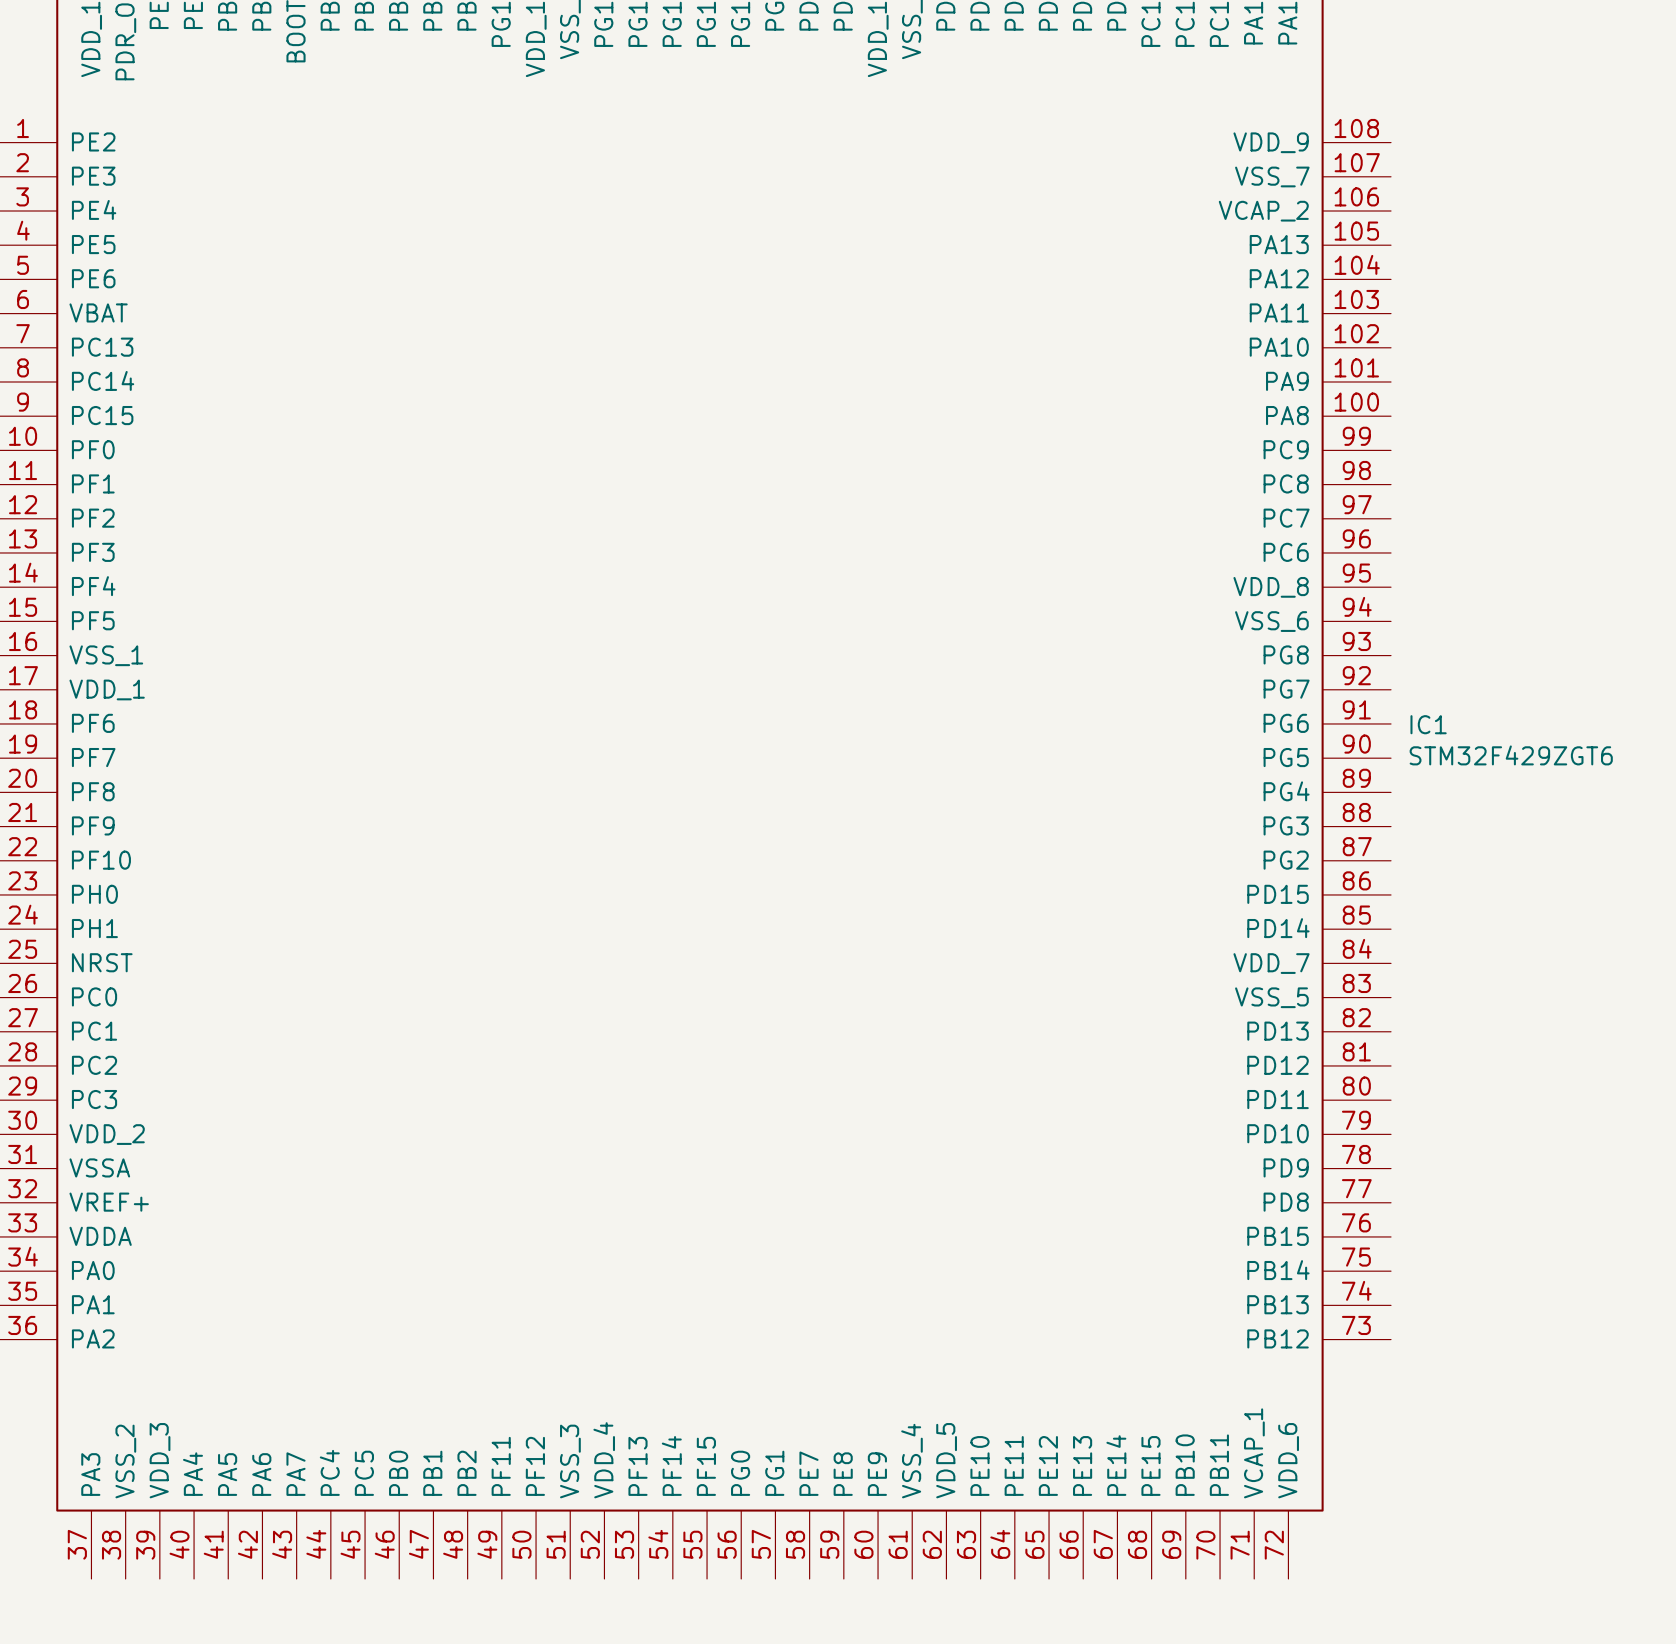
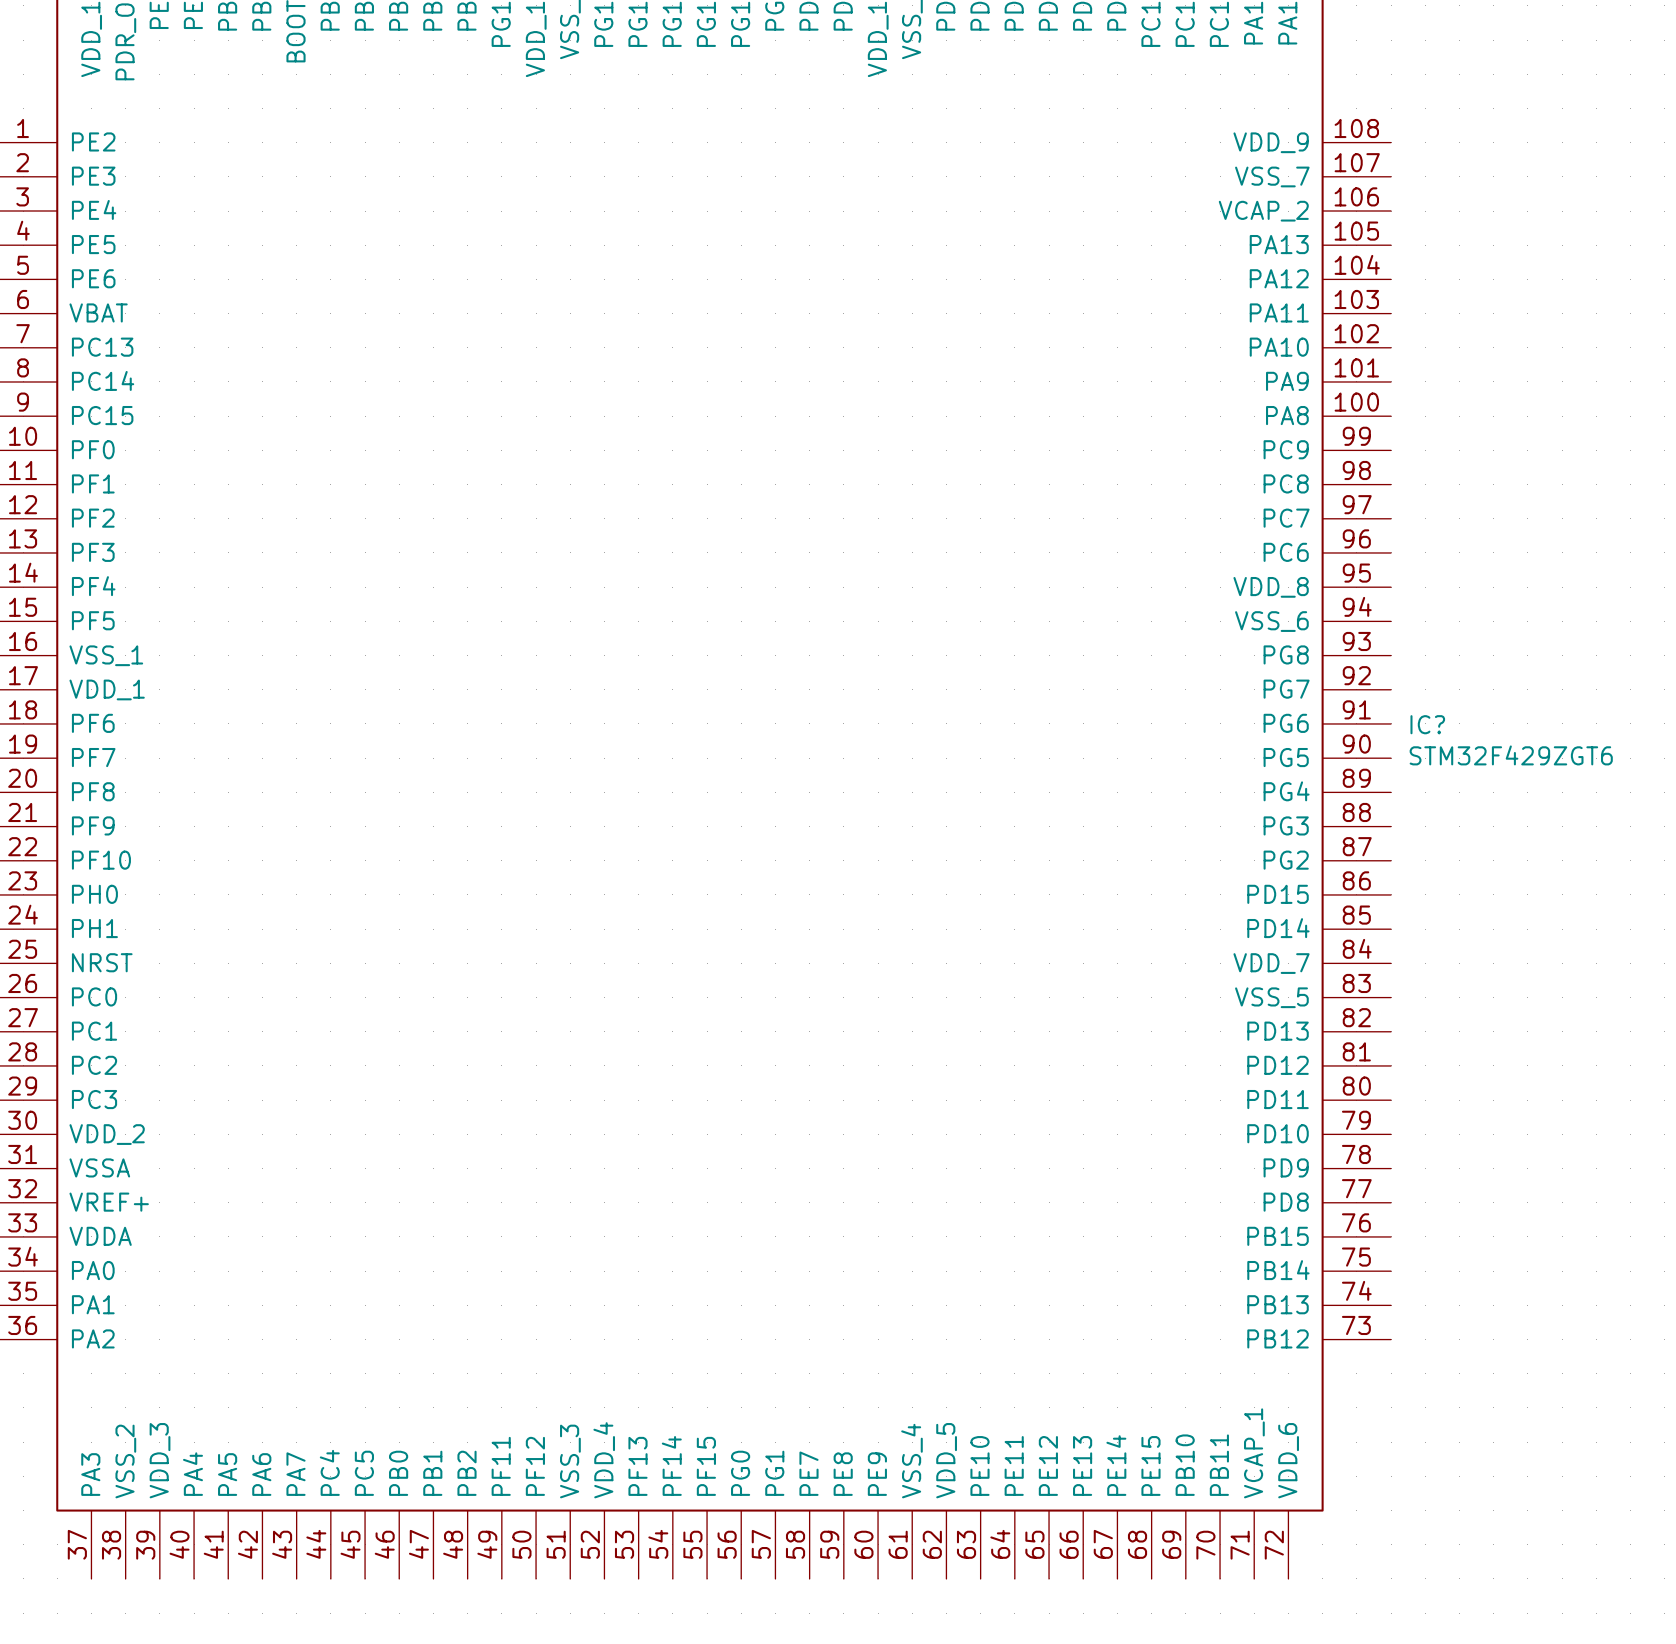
IC1 name: IC1 (1428, 724) -> IC? (1427, 724)

